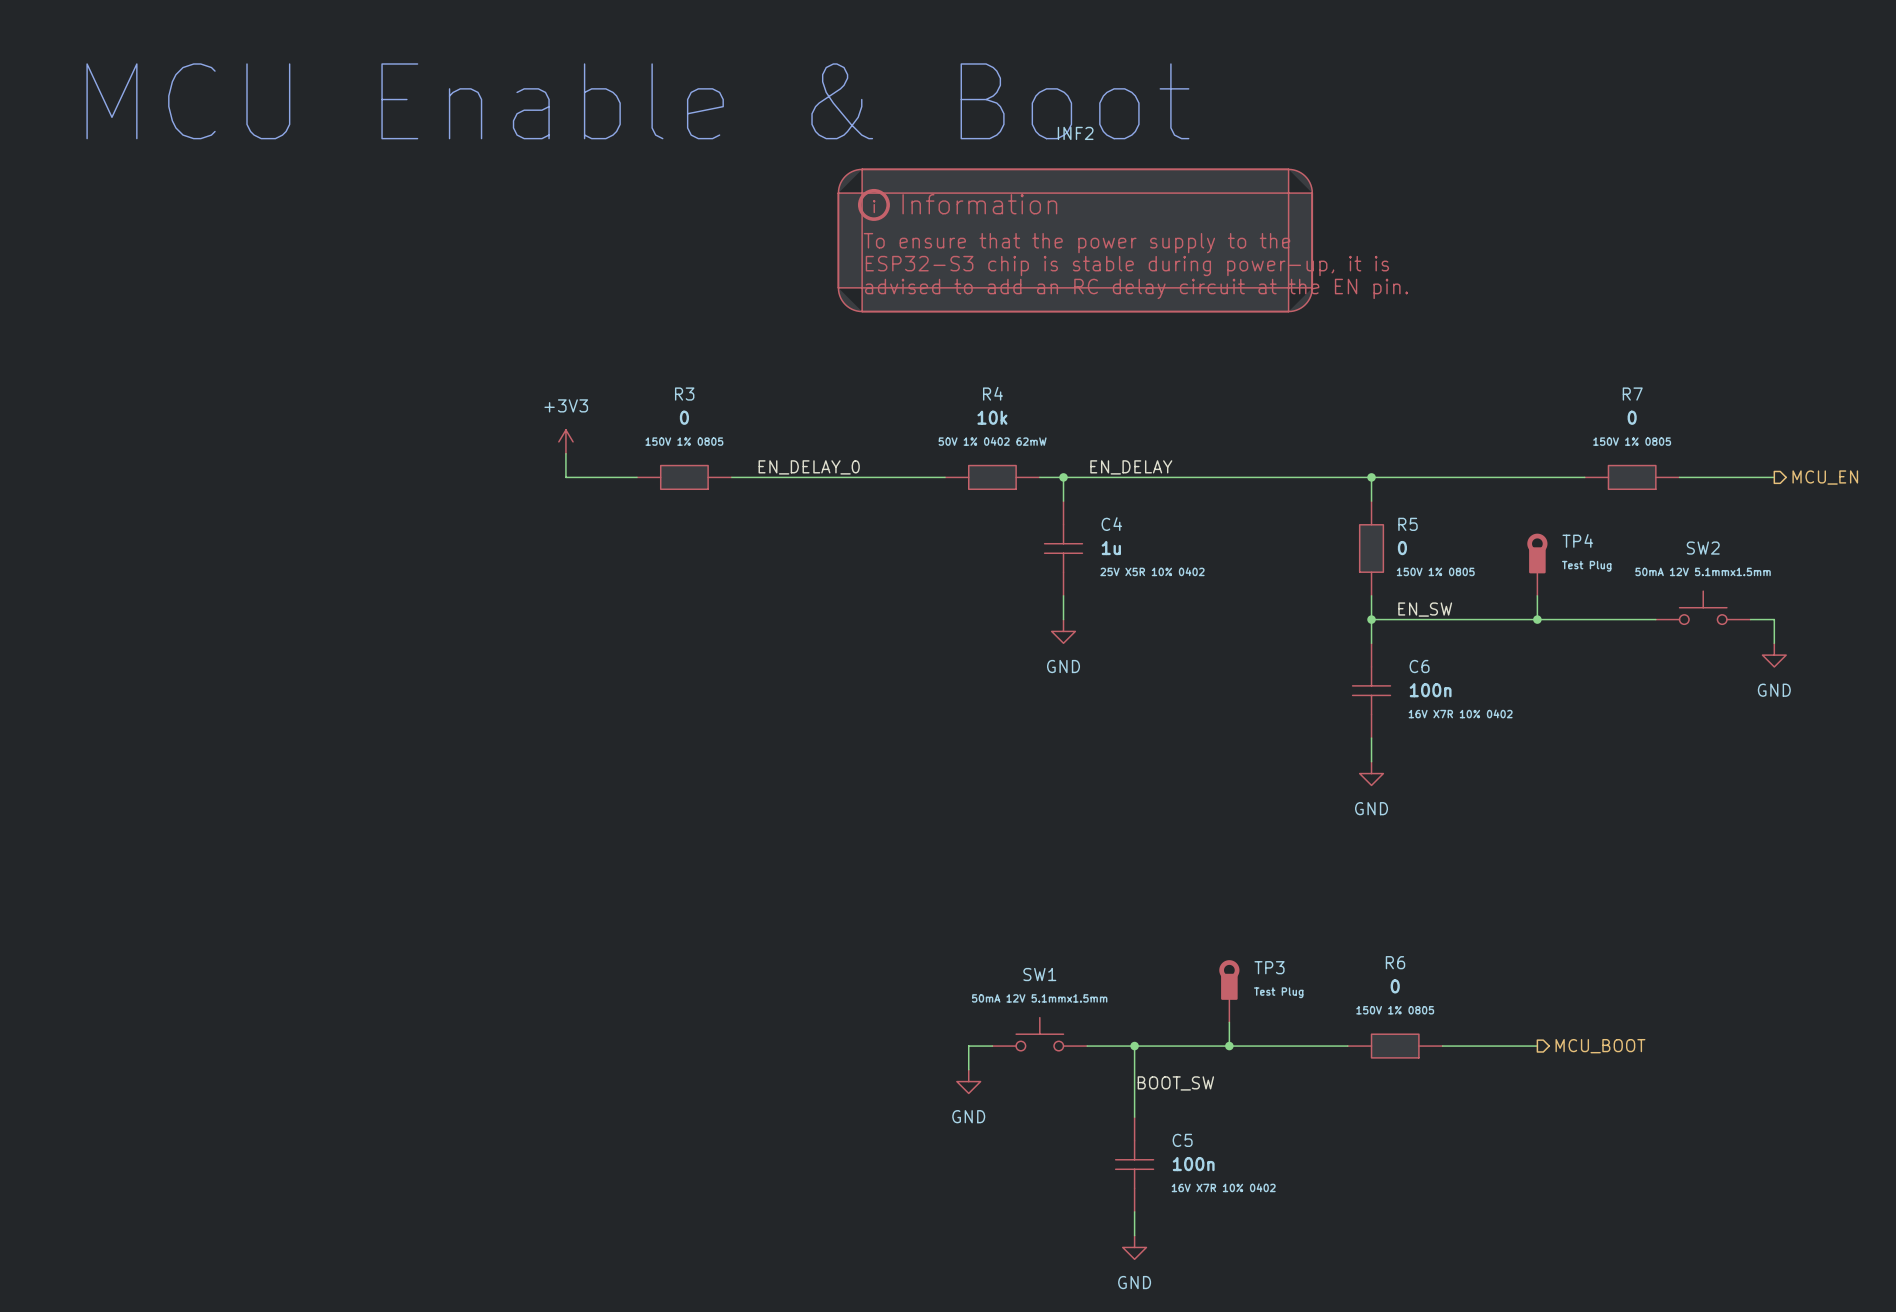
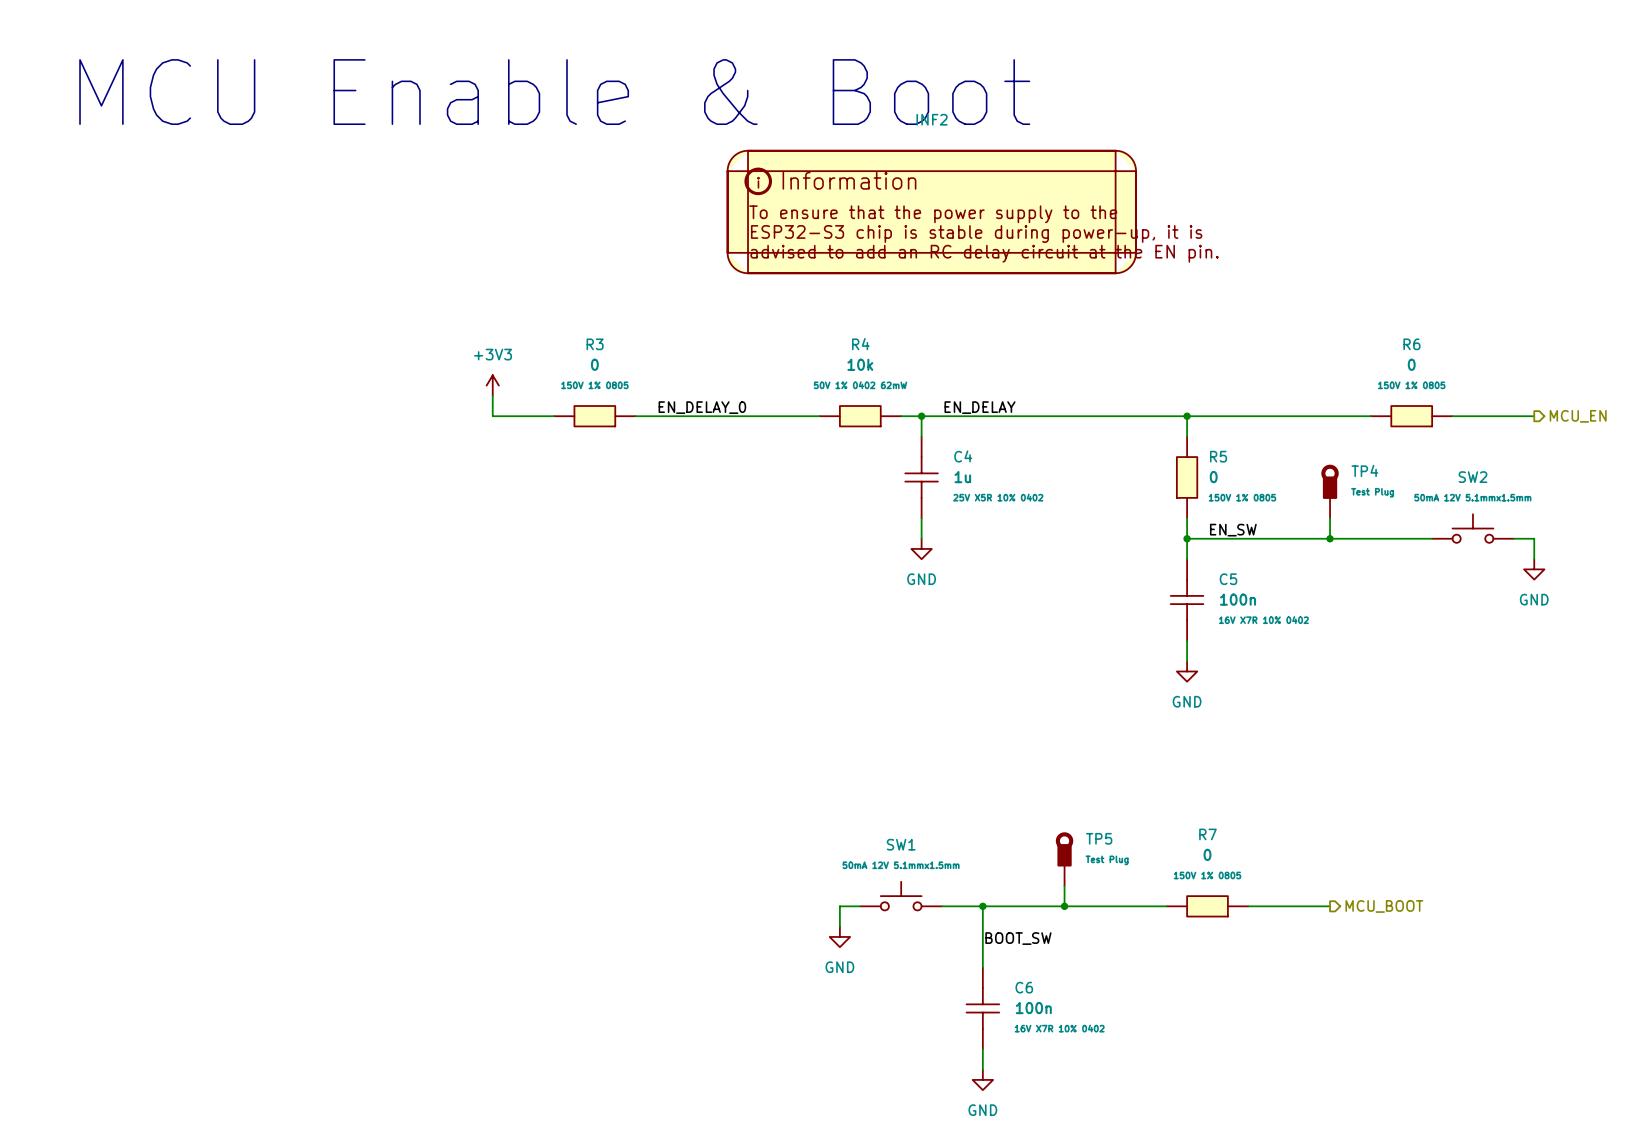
R7 name: R7 (1632, 394) -> R6 (1411, 344)
C6 name: C6 (1419, 666) -> C5 (1228, 579)
R6 name: R6 (1395, 962) -> R7 (1207, 834)
TP3 name: TP3 (1269, 967) -> TP5 (1099, 838)
C5 name: C5 (1182, 1140) -> C6 (1024, 987)

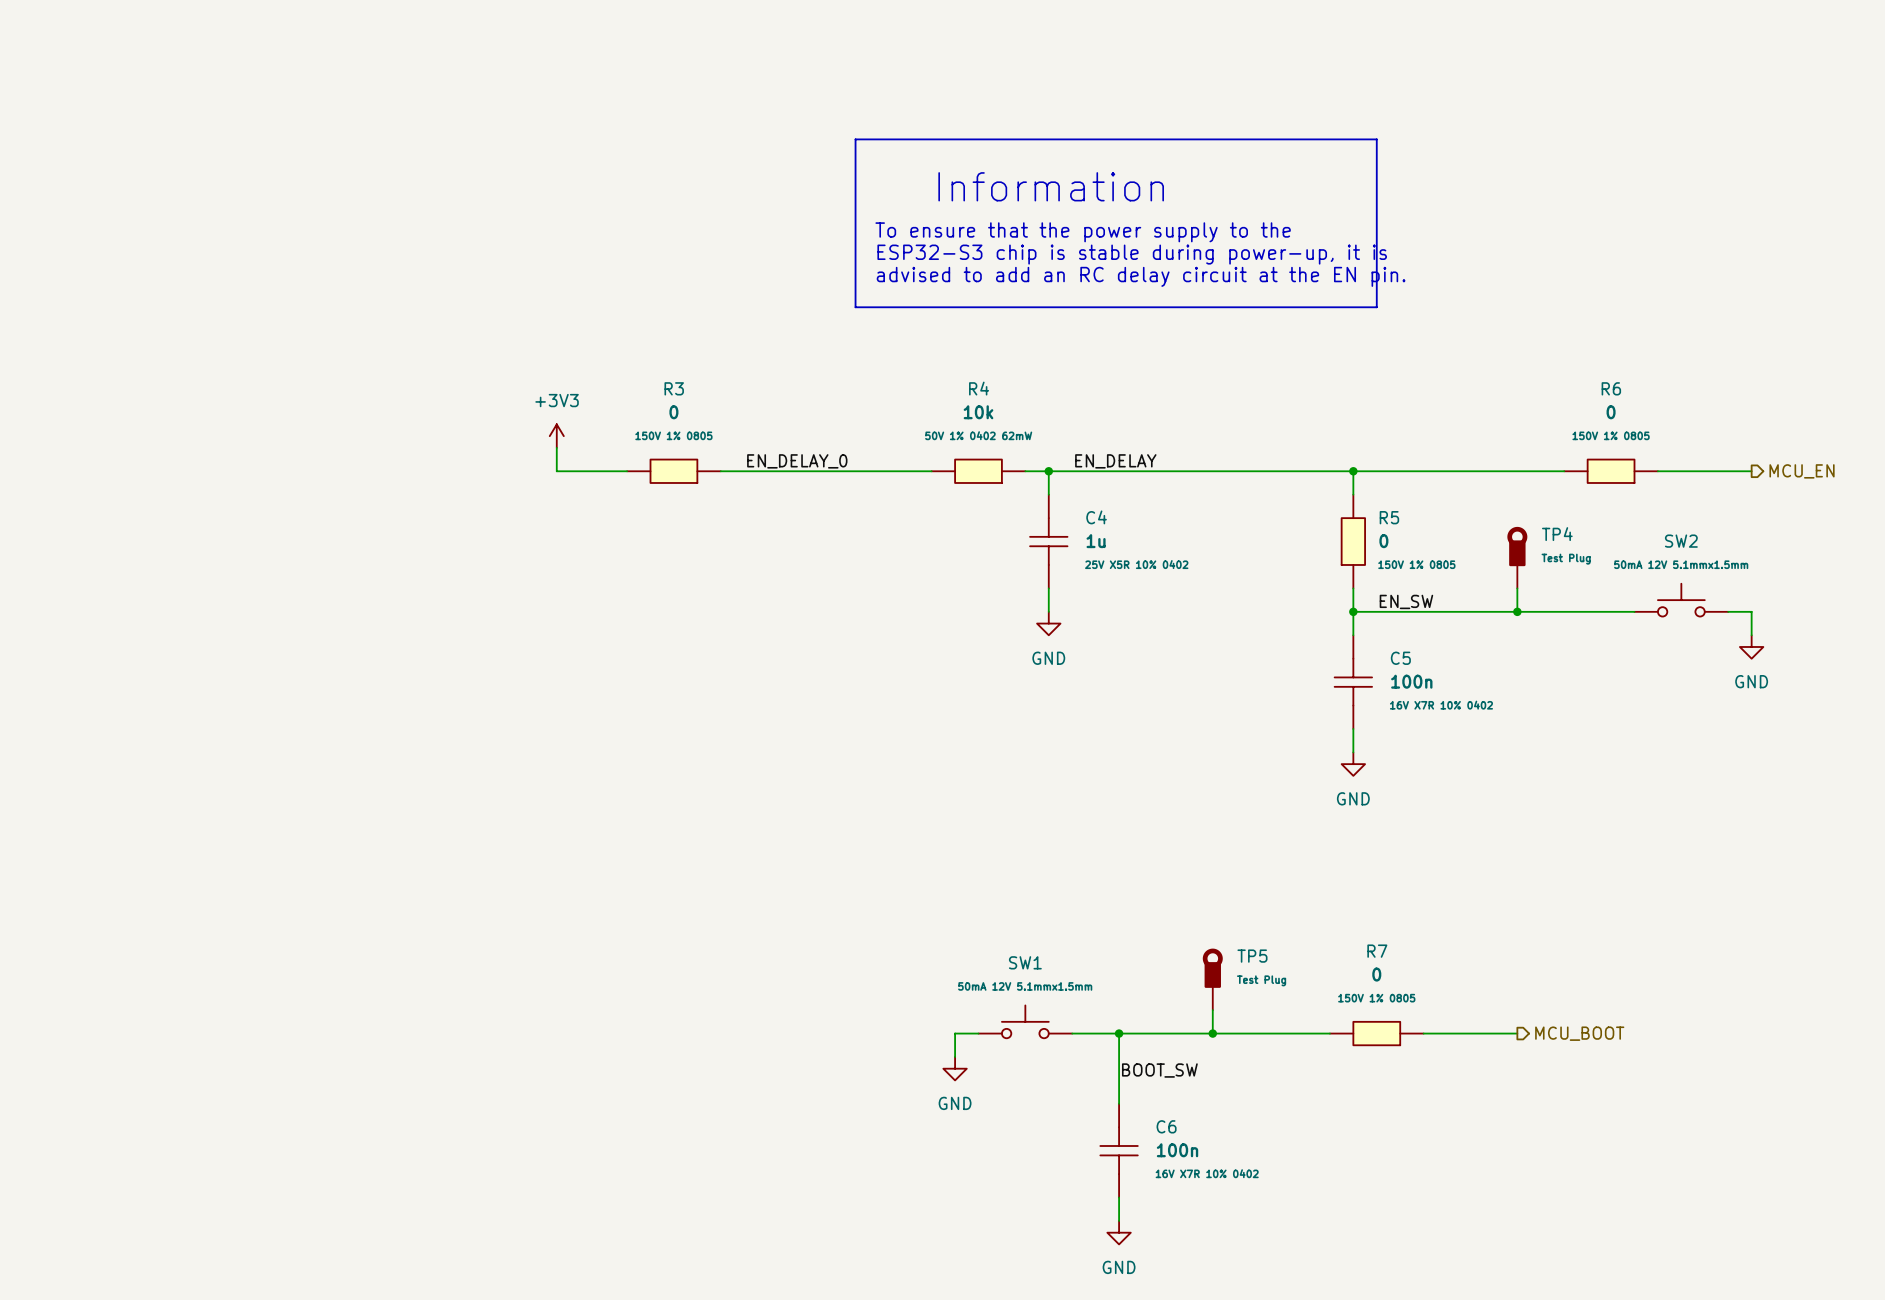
text: MCU Enable & Boot (554, 92) -> none
line: none -> (855, 139) (1376, 139) (1376, 307) (855, 307) (855, 139)
text: none -> Information (1051, 186)
text: none -> To ensure that the power supply to the (1083, 232)
INF2: (931, 212) -> none
text: none -> ESP32-S3 chip is stable during power-up, it is (1132, 254)
text: none -> advised to add an RC delay circuit at the EN pin. (1141, 276)

